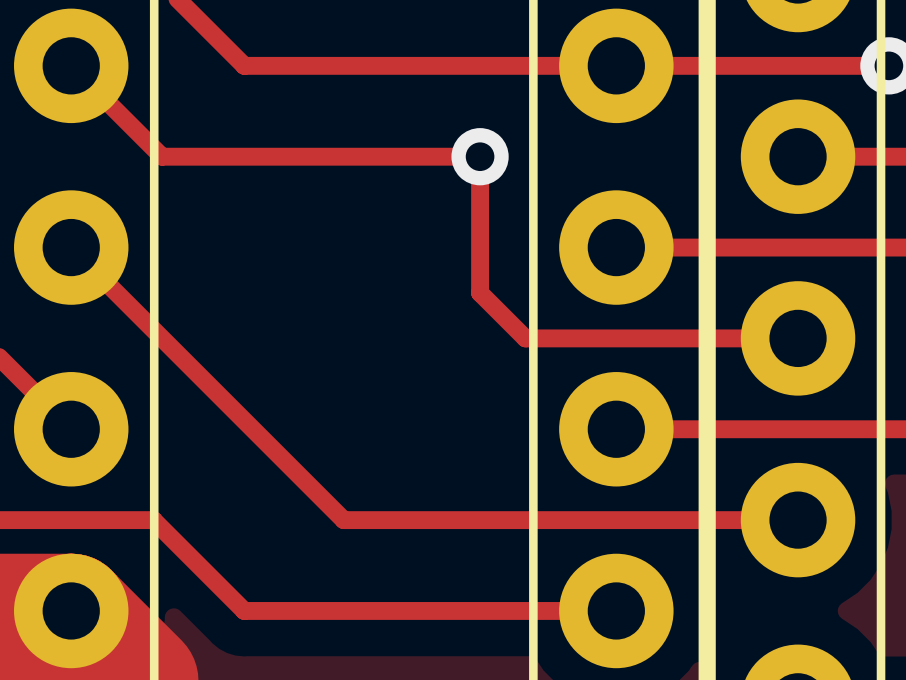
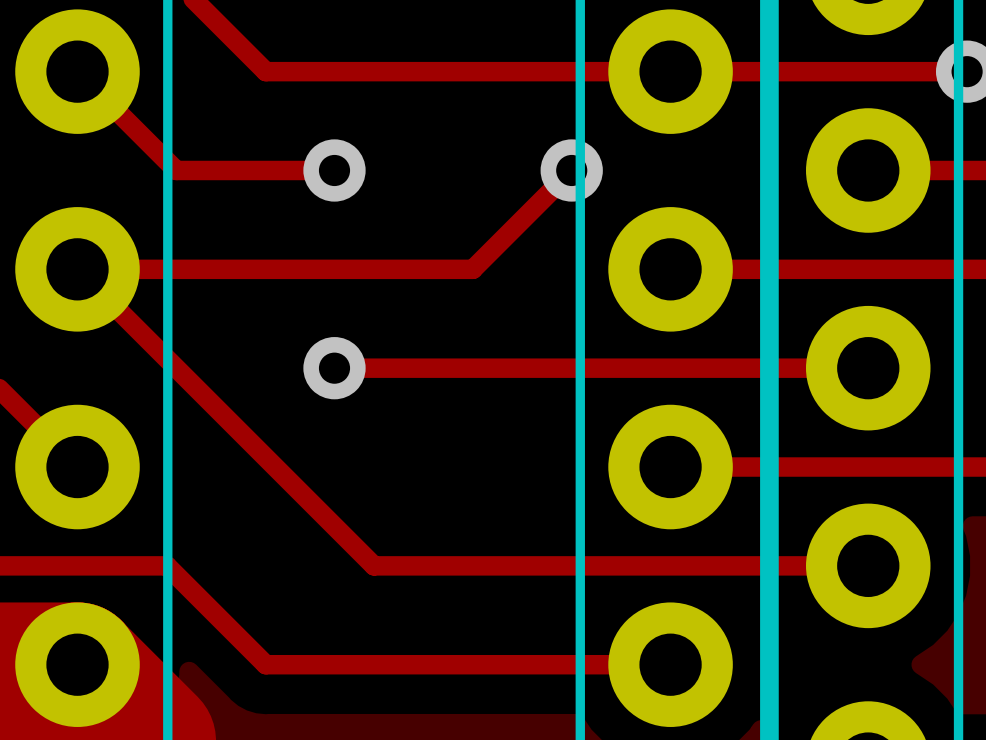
track: (307, 156) (480, 156) (480, 292) (525, 338) -> (334, 368) (571, 368)
via: none -> (334, 170)
via position: (480, 156) -> (571, 170)
track: none -> (571, 170) (472, 269) (77, 269)
via: none -> (334, 368)

